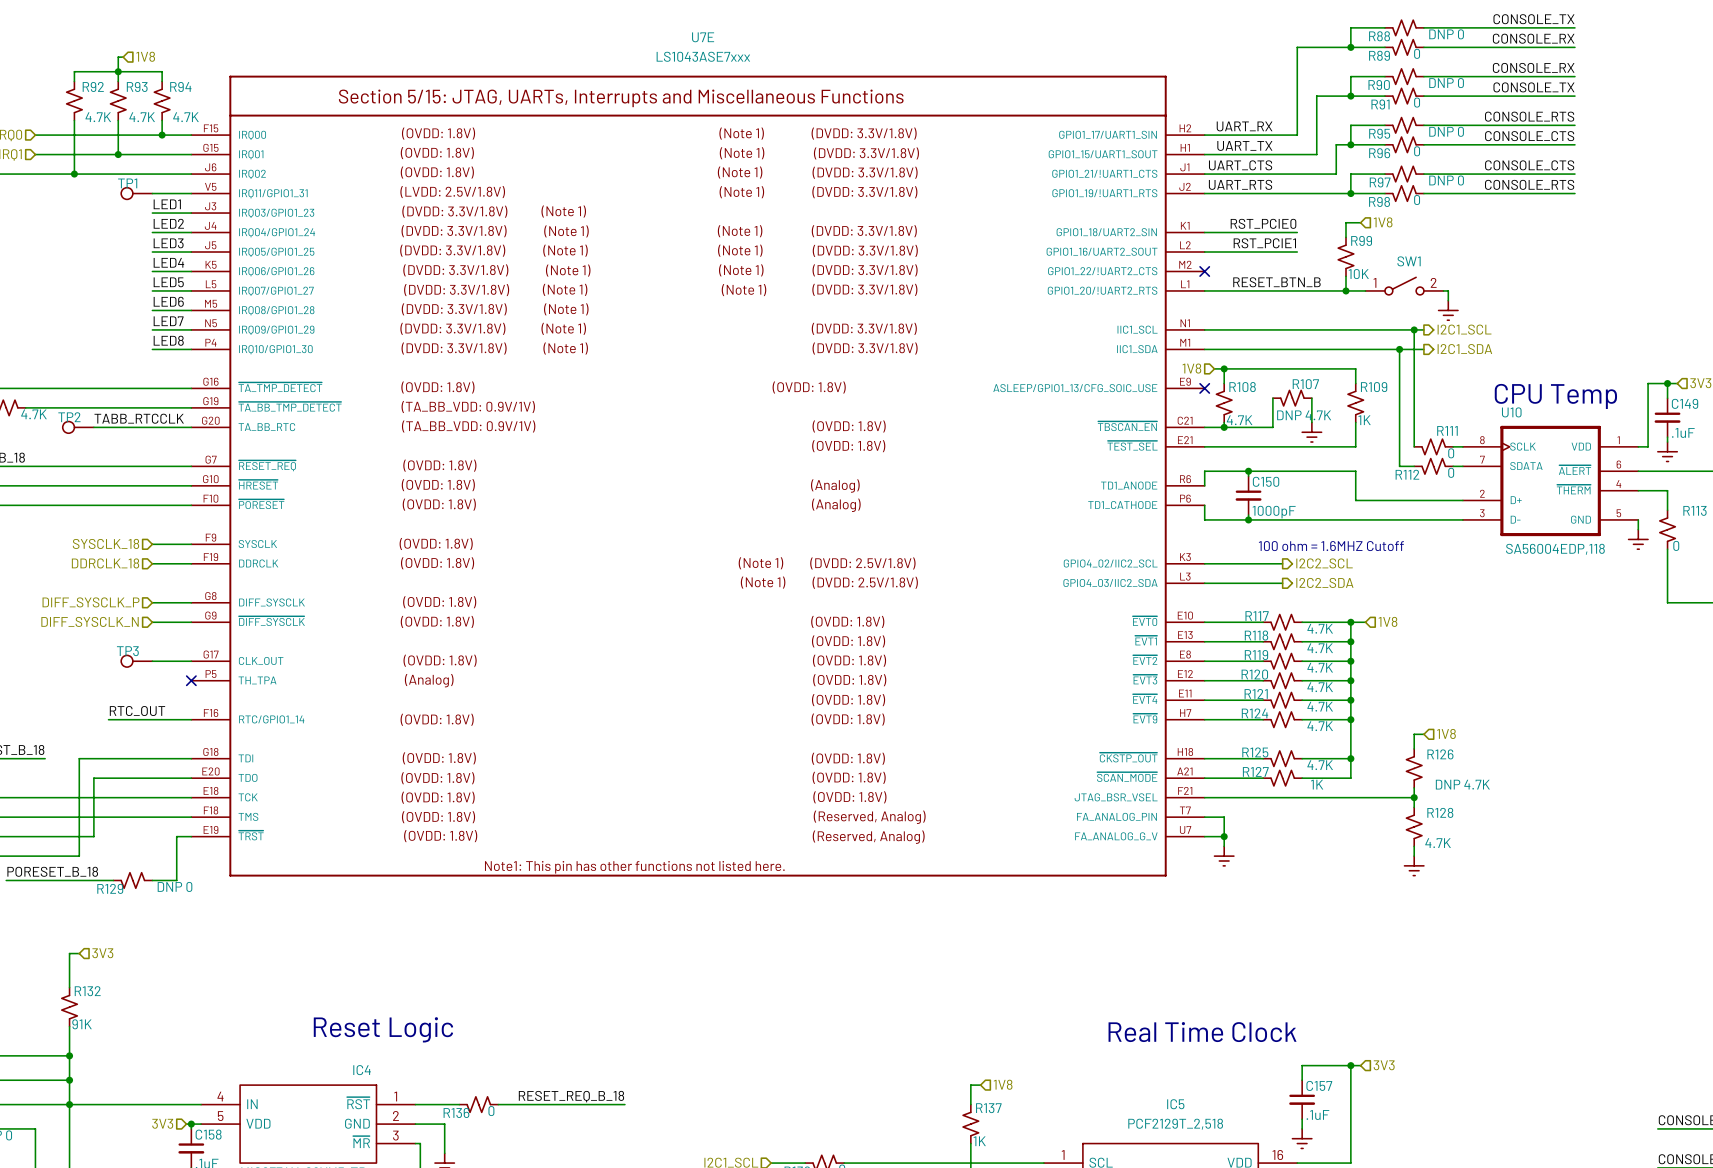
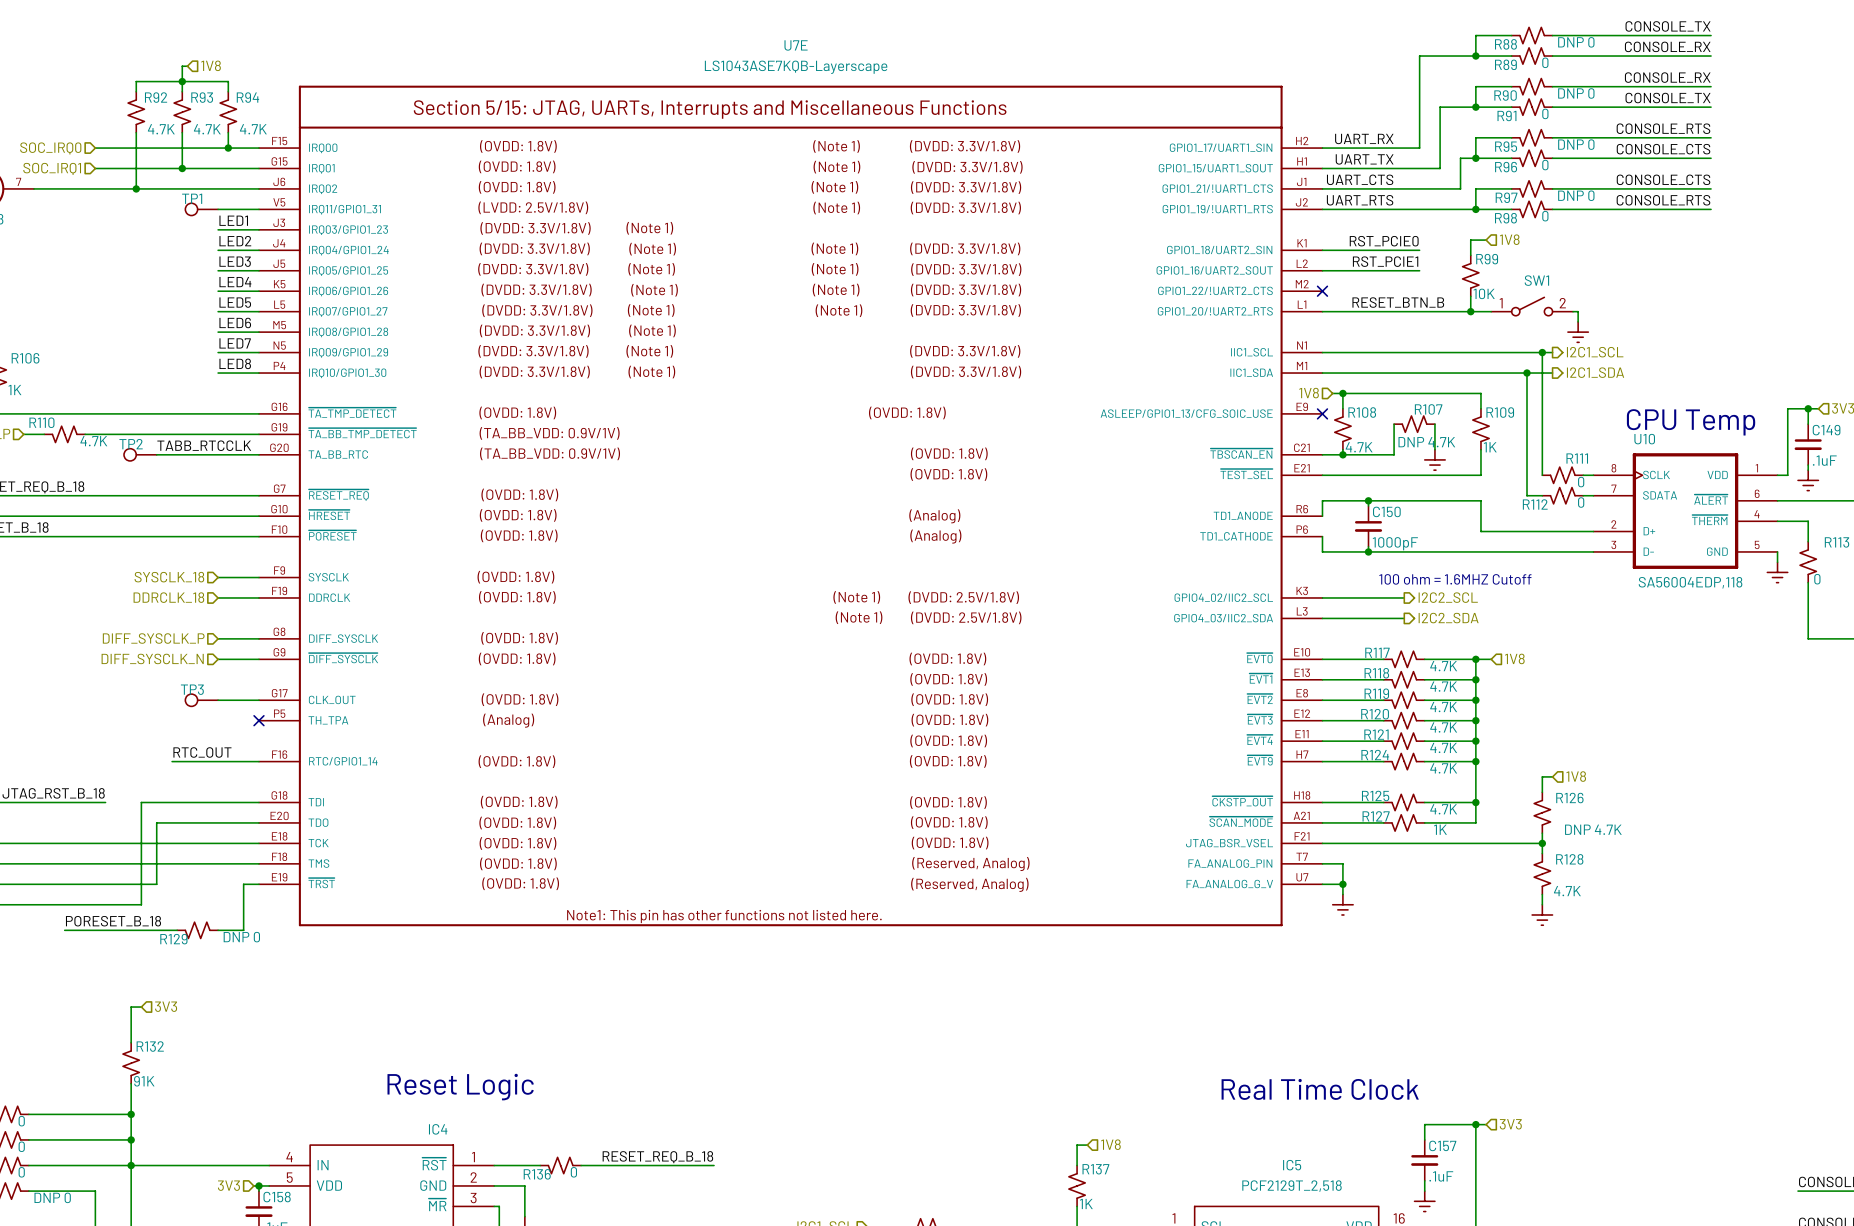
U7E value: LS1043ASE7xxx (703, 56) -> LS1043ASE7KQB-Layerscape (796, 67)

